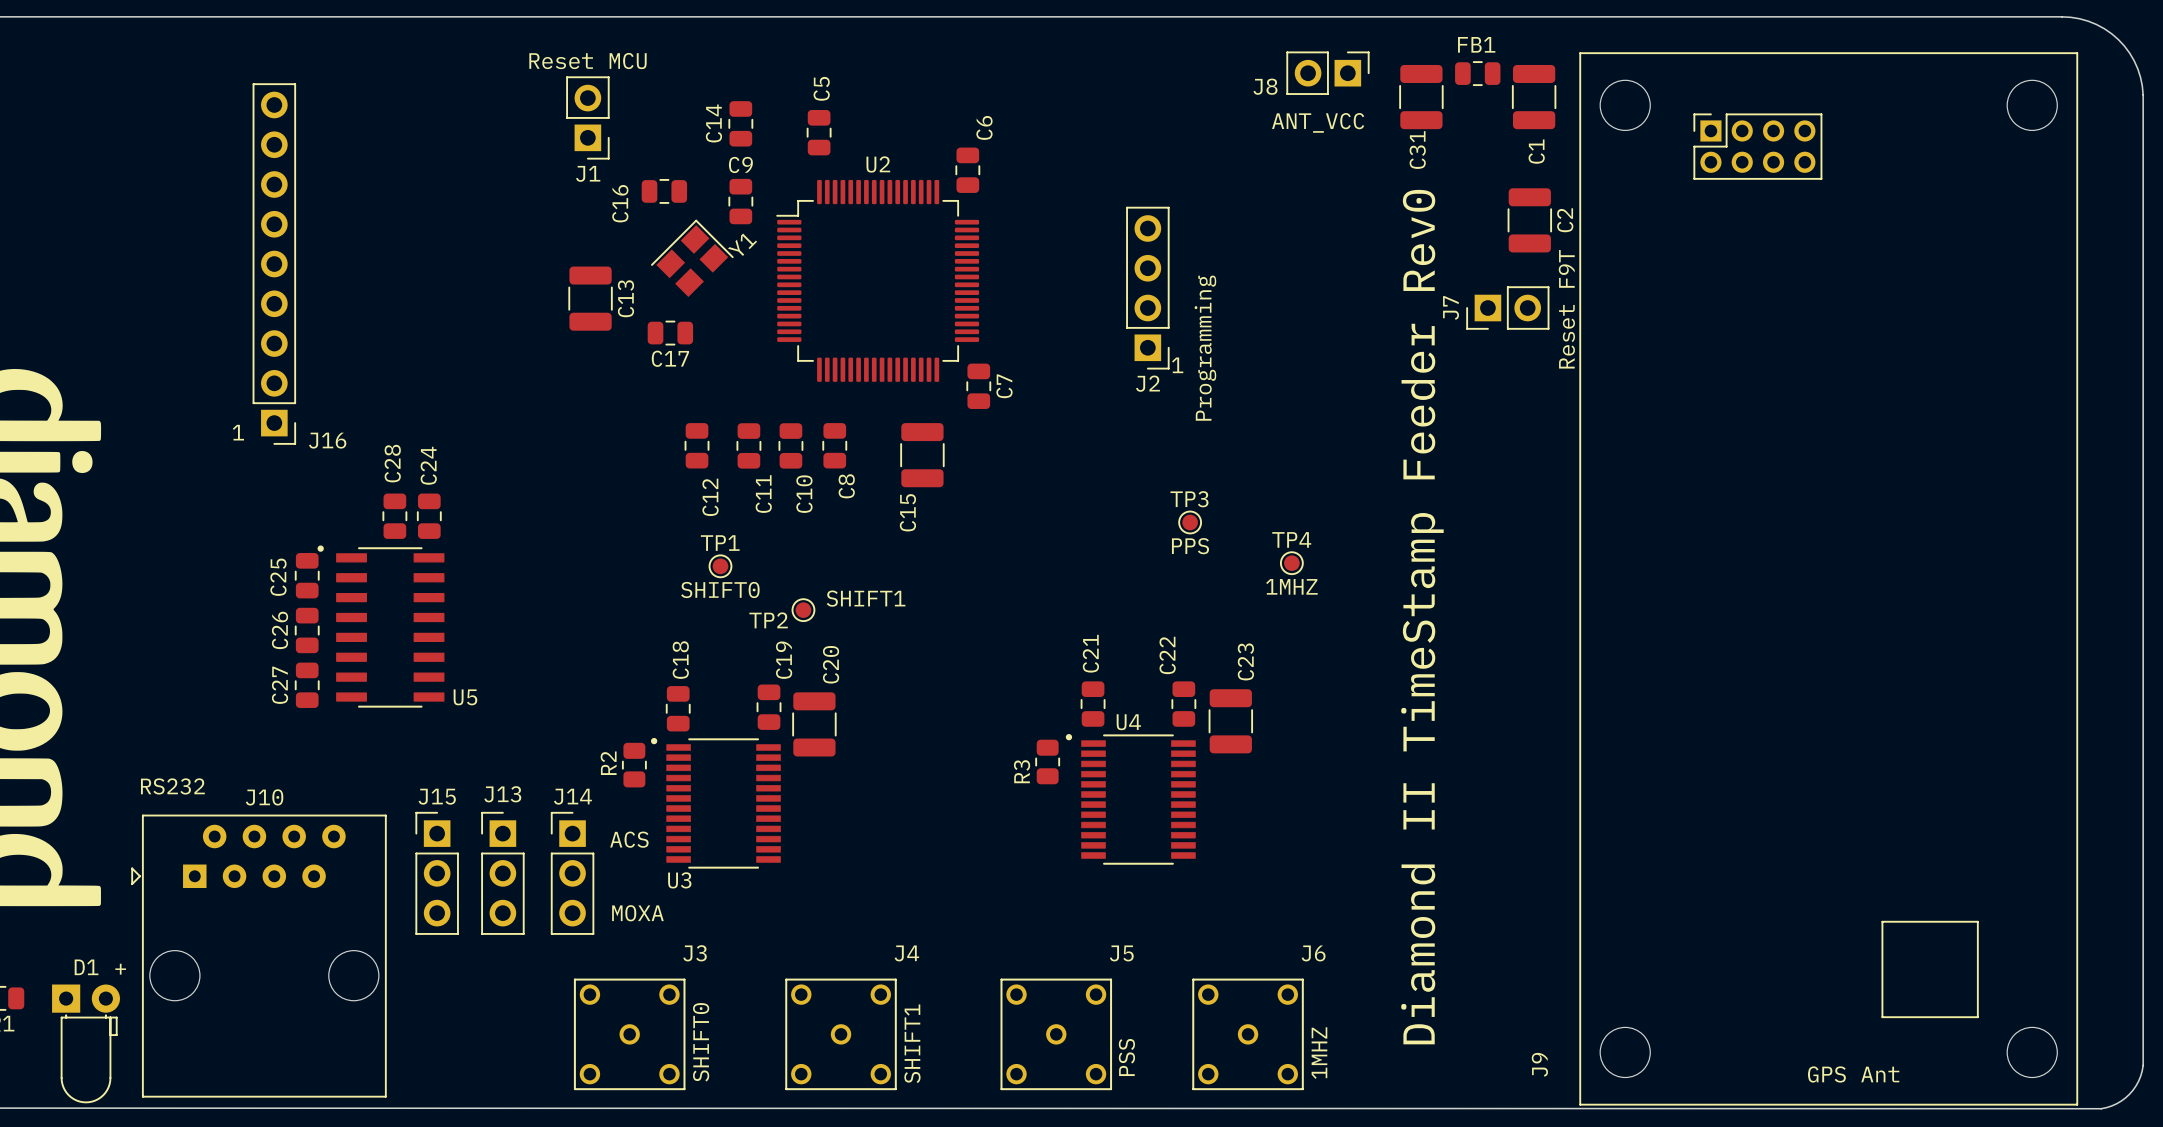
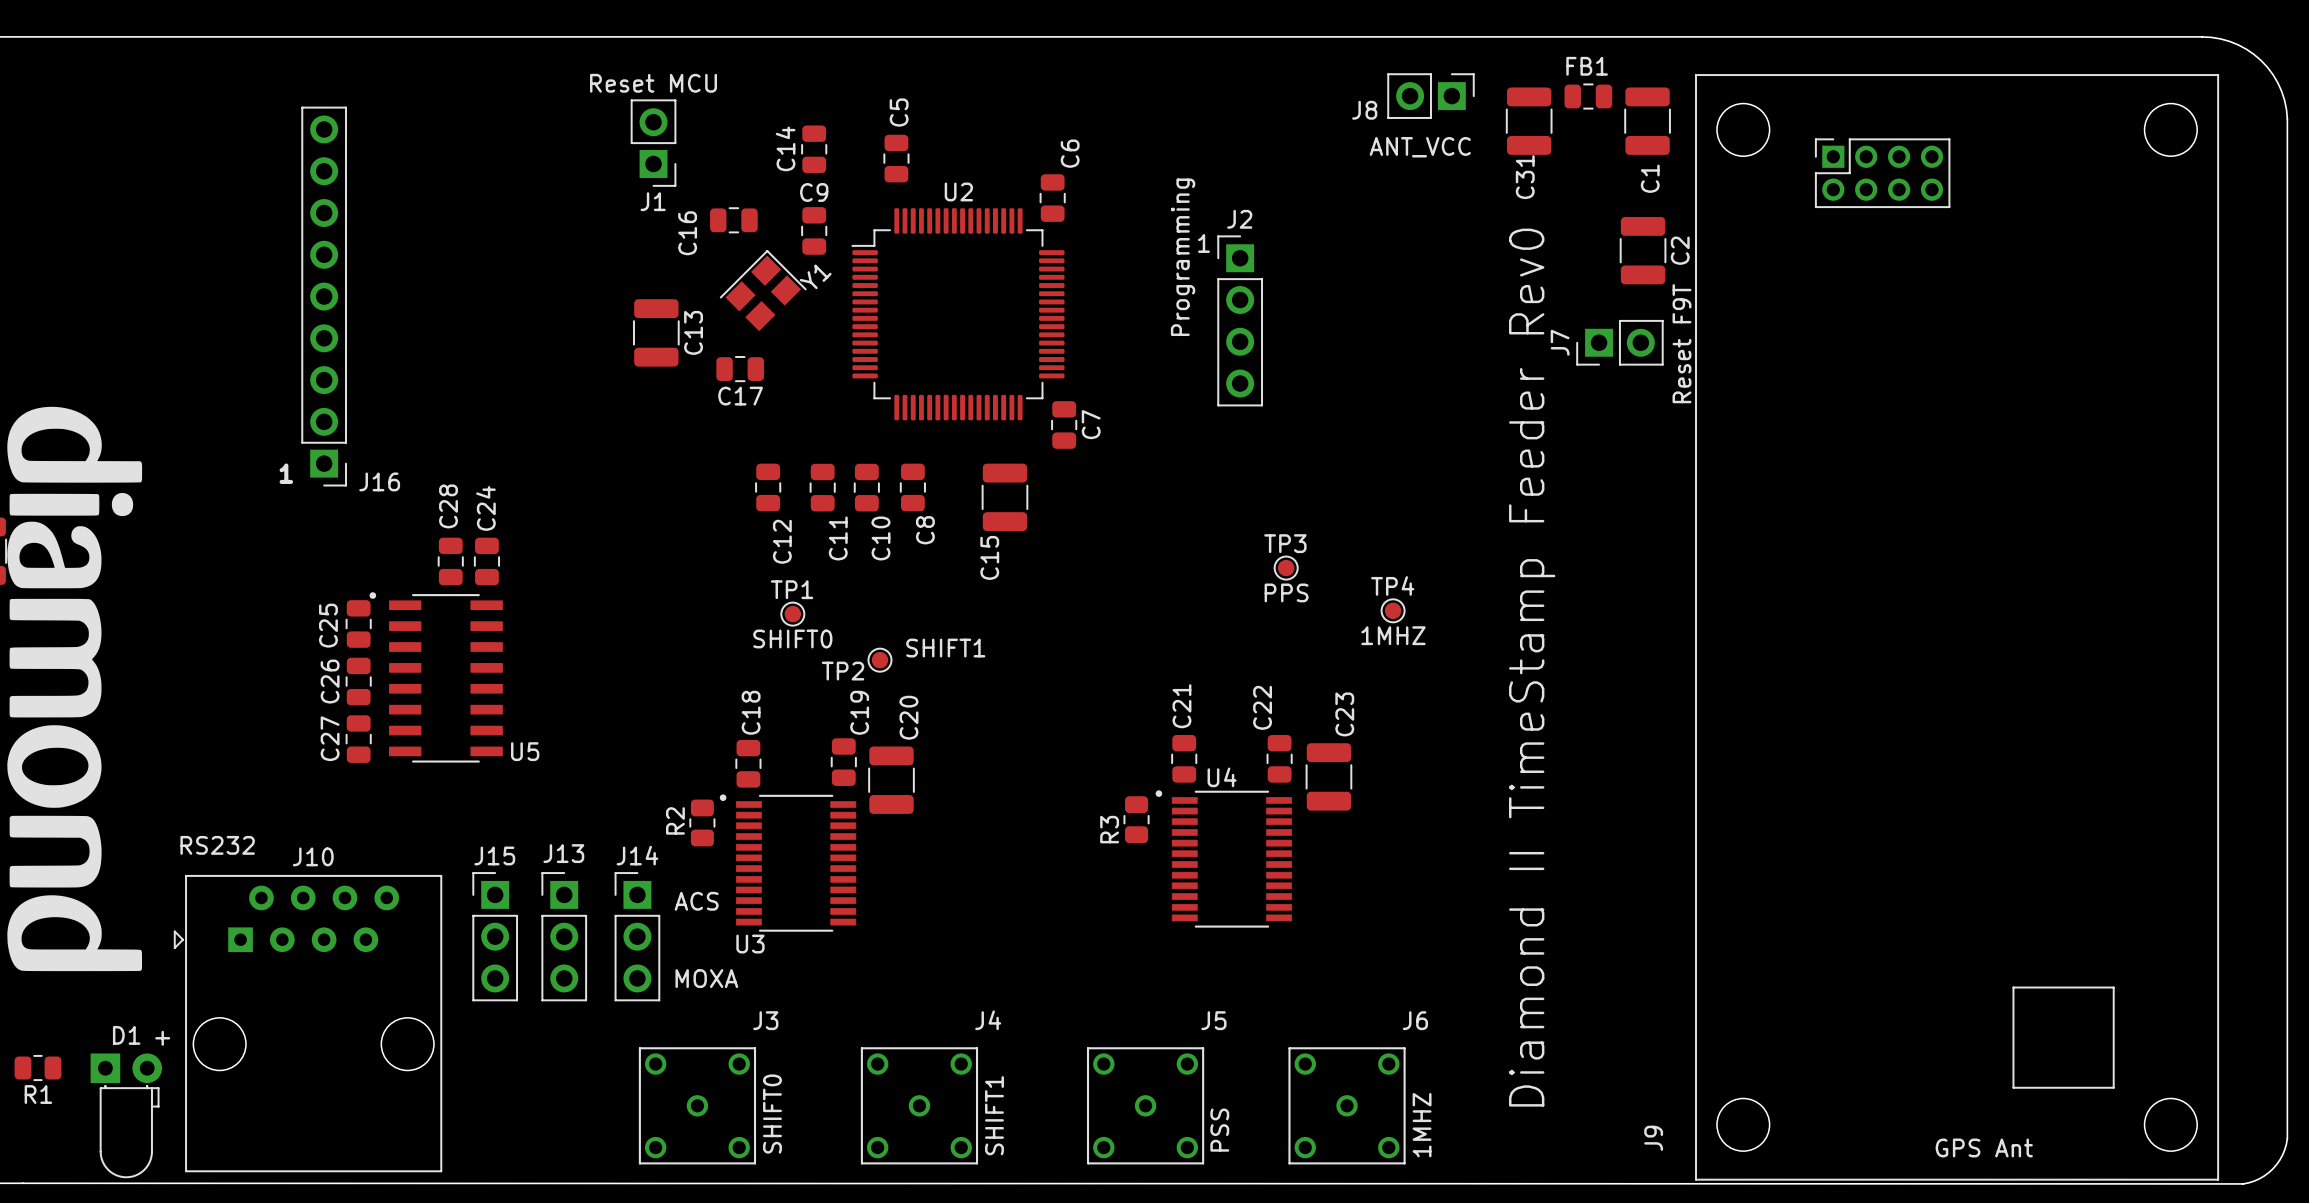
J2 rotation: 0° (1147, 288) -> 180° (1240, 320)
text position: 1 (1177, 365) -> 1 (1203, 243)

